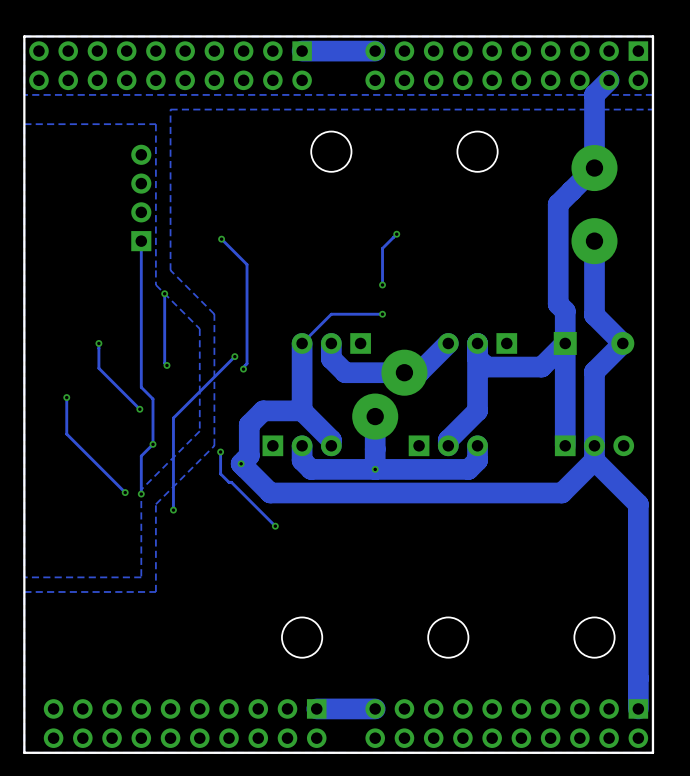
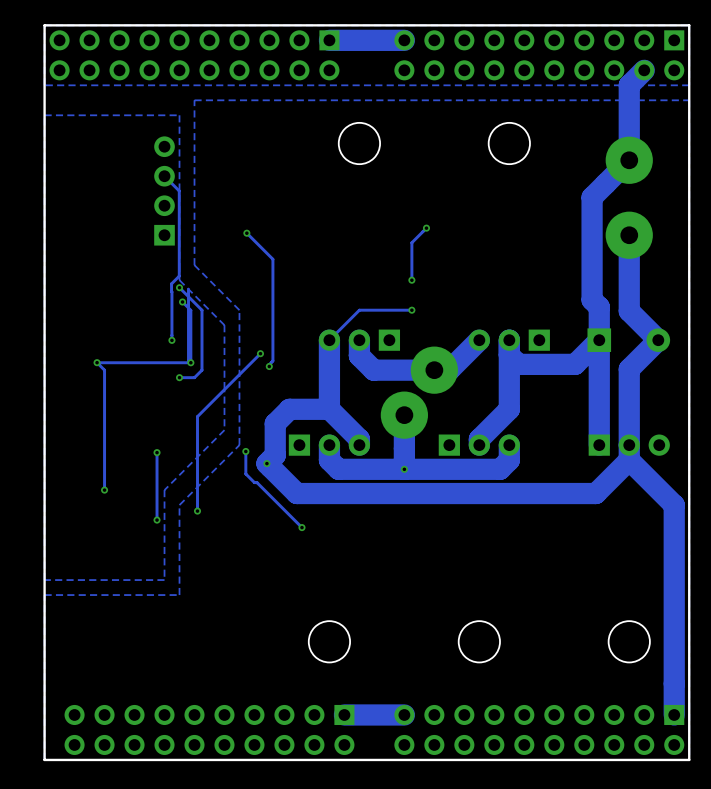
track: none -> (164, 176) (179, 190) (179, 276) (171, 283) (171, 340)
track: (141, 241) (141, 387) (153, 399) (153, 444) (141, 456) (141, 494) -> none
track: none -> (179, 287) (202, 310) (202, 370) (194, 377) (179, 377)
via: none -> (179, 287)
via: (164, 293) -> none
track: none -> (182, 302) (190, 310) (190, 362) (97, 362)
via: none -> (182, 302)
track: (98, 343) (98, 368) (139, 409) -> none
via: (98, 343) -> none
via: none -> (171, 340)
track: none -> (97, 362) (104, 370) (104, 490)
via: none -> (97, 362)
via: none -> (179, 377)
track: (66, 397) (66, 434) (125, 492) -> none
via: (66, 397) -> none
via: (139, 409) -> none
via: (153, 444) -> none
track: none -> (157, 452) (157, 520)
via: none -> (157, 452)
via: none -> (104, 490)
via: (125, 492) -> none
via: (141, 494) -> none
via: none -> (157, 520)

